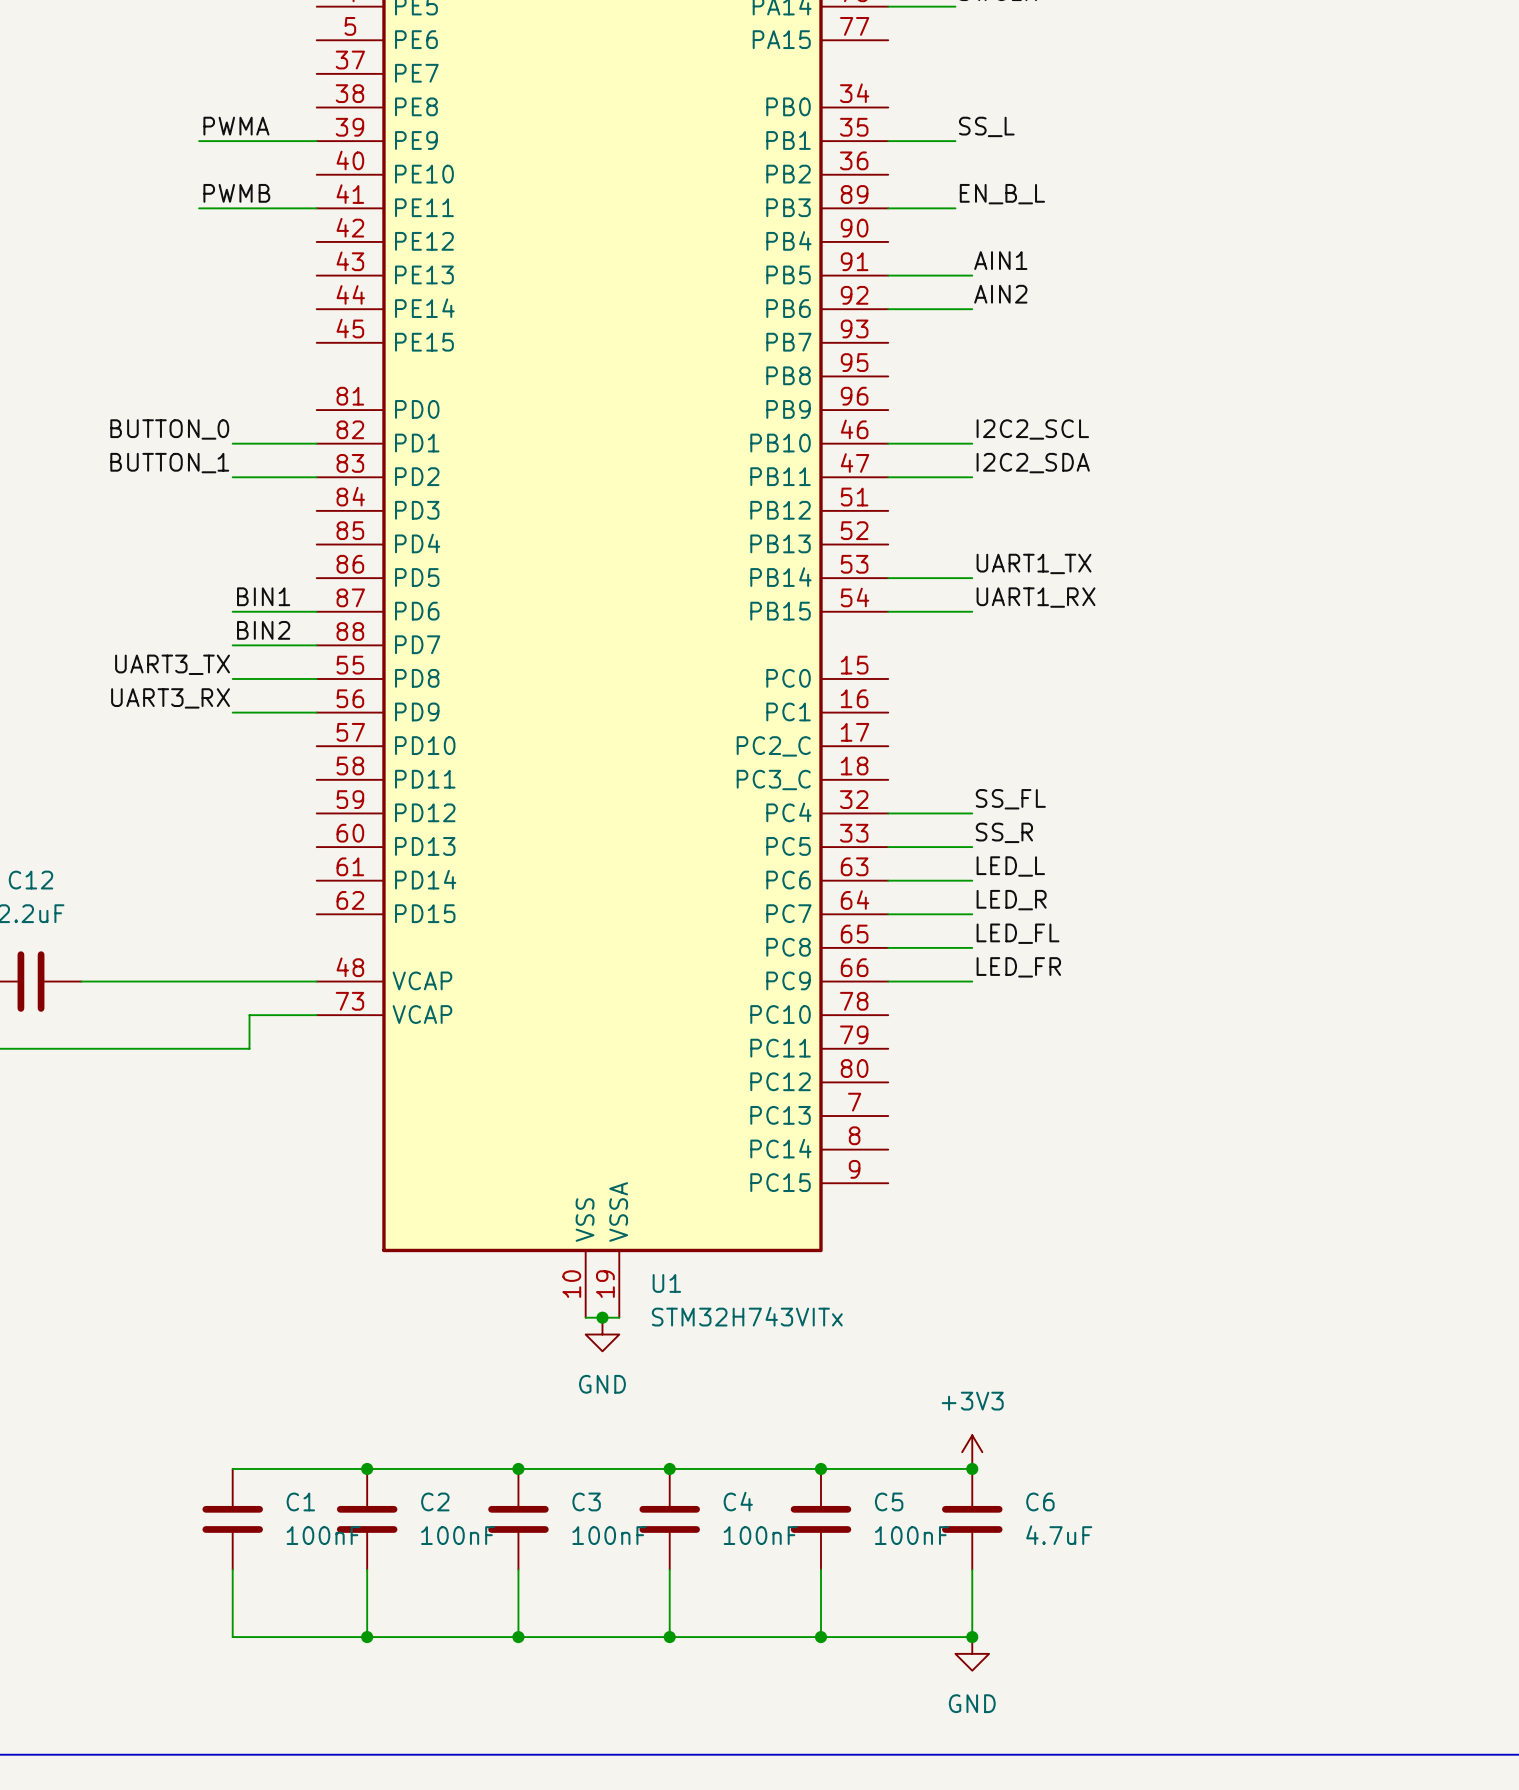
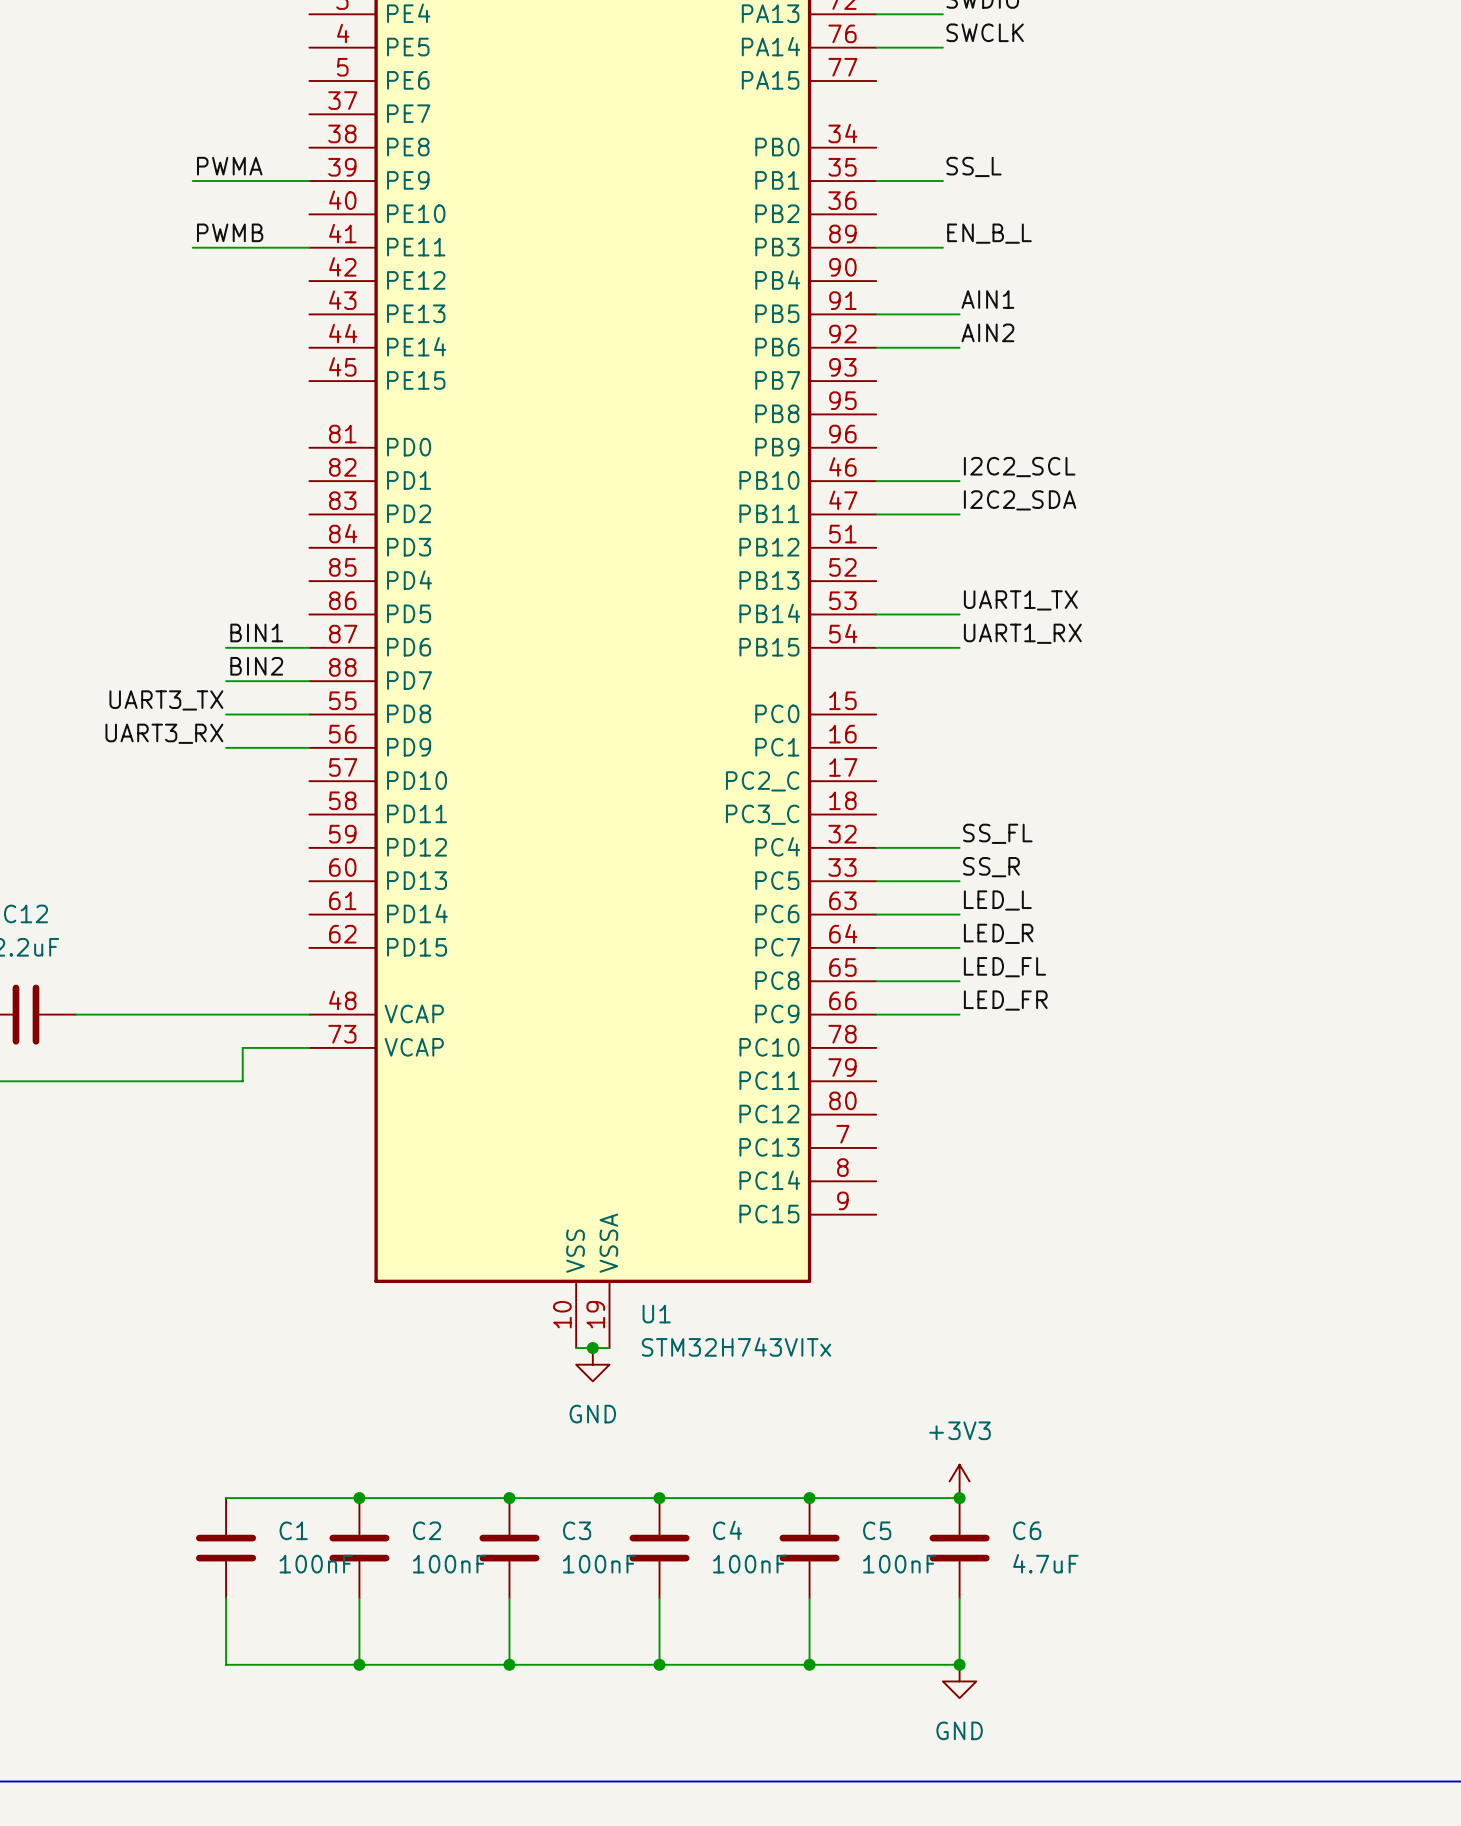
label: BUTTON_0 (169, 429) -> none
wire: (232, 443) (316, 443) -> none
label: BUTTON_1 (169, 463) -> none
wire: (232, 477) (316, 477) -> none

